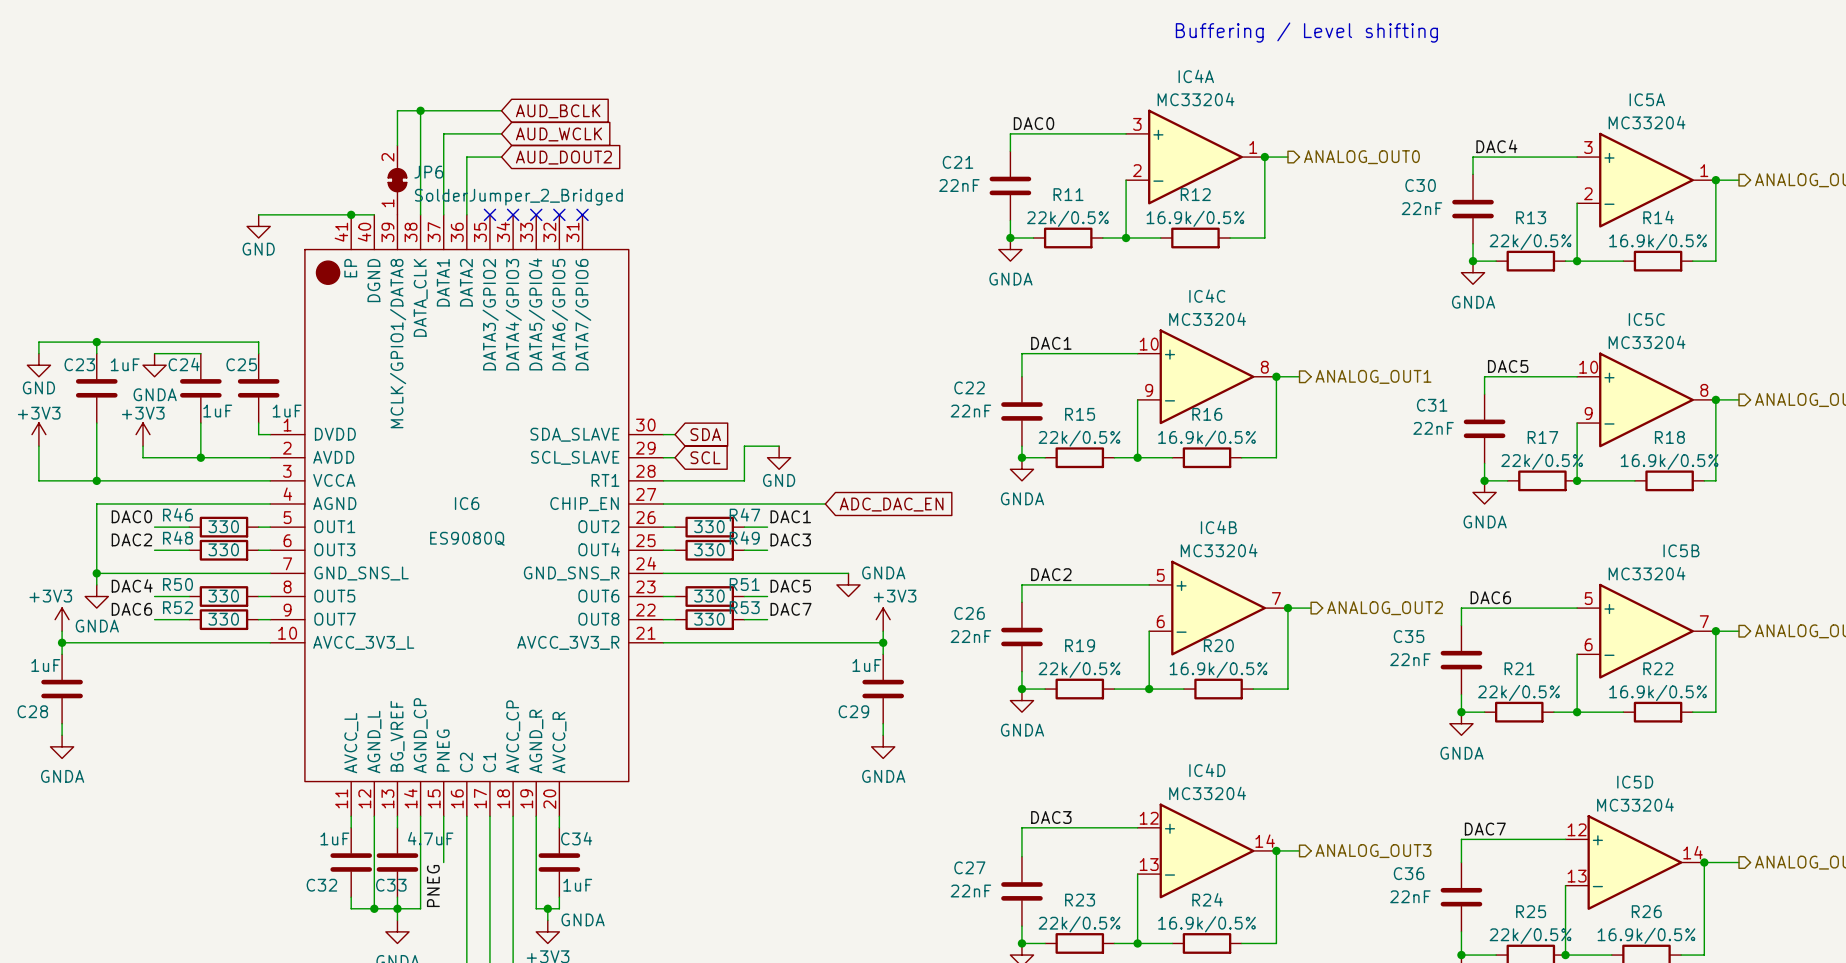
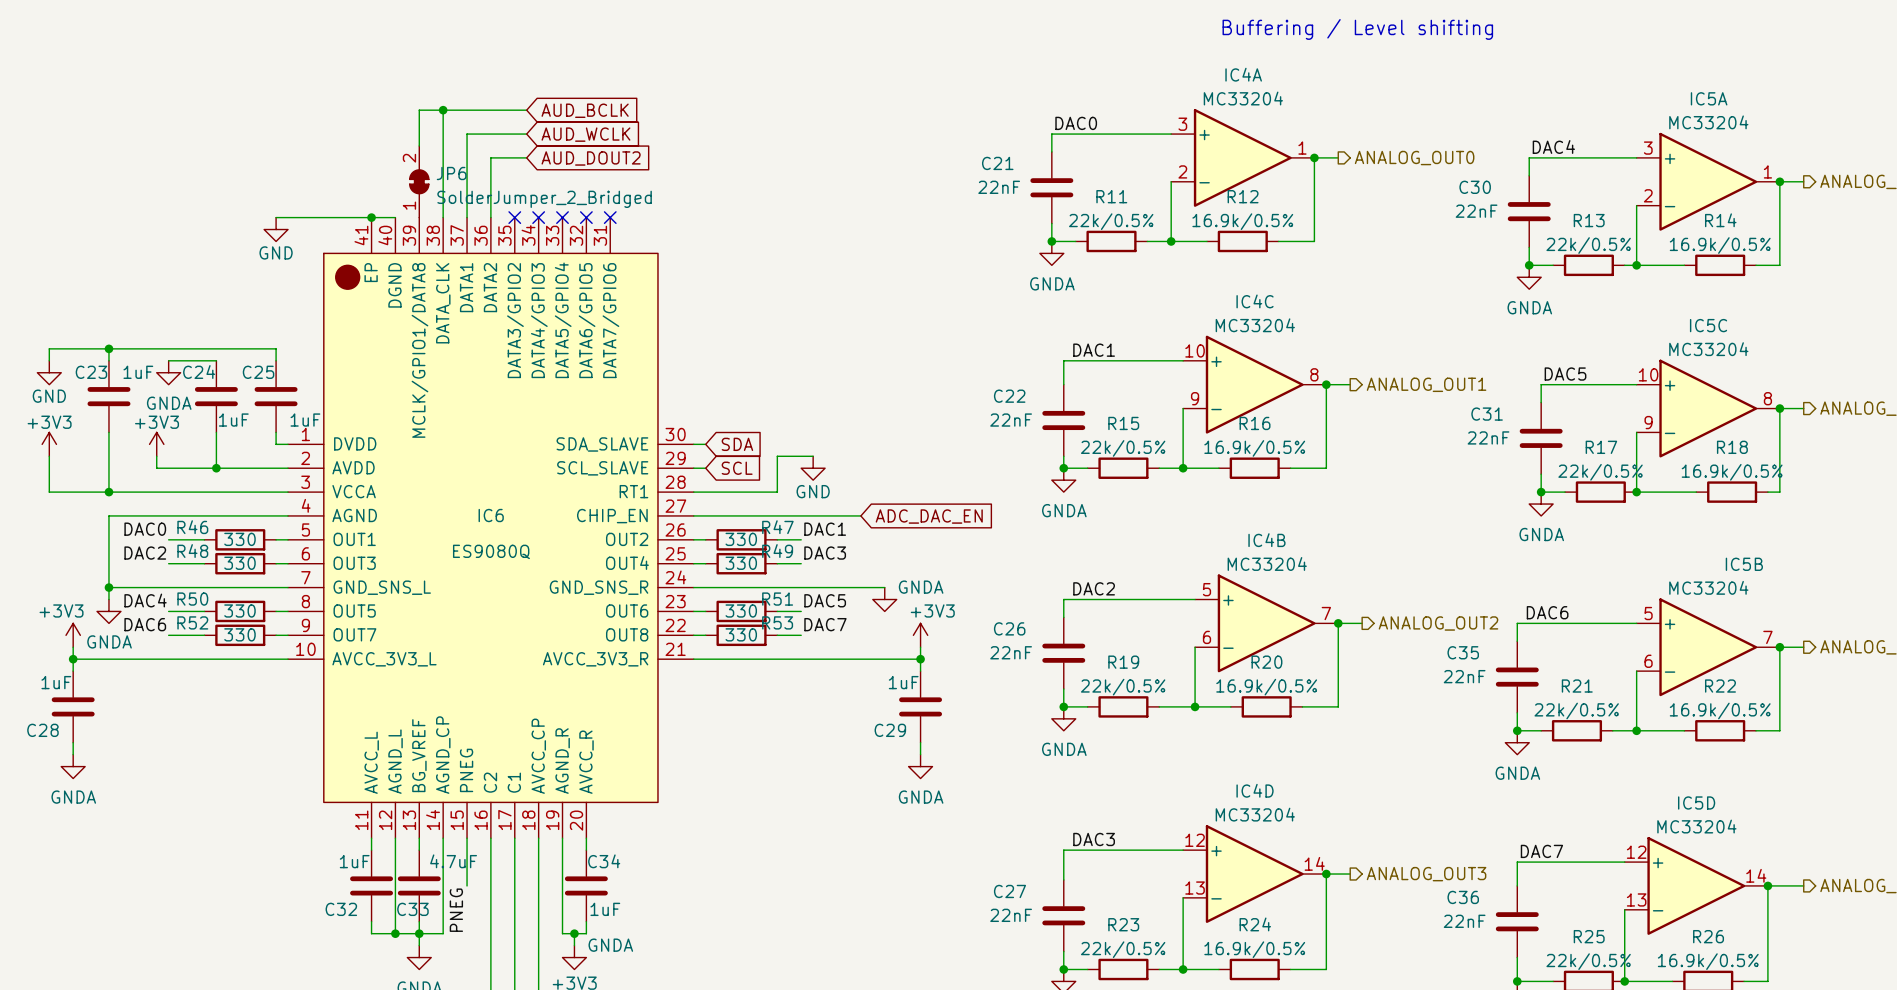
IC6 symbol: [270, 214, 664, 817] -> [288, 217, 694, 839]

